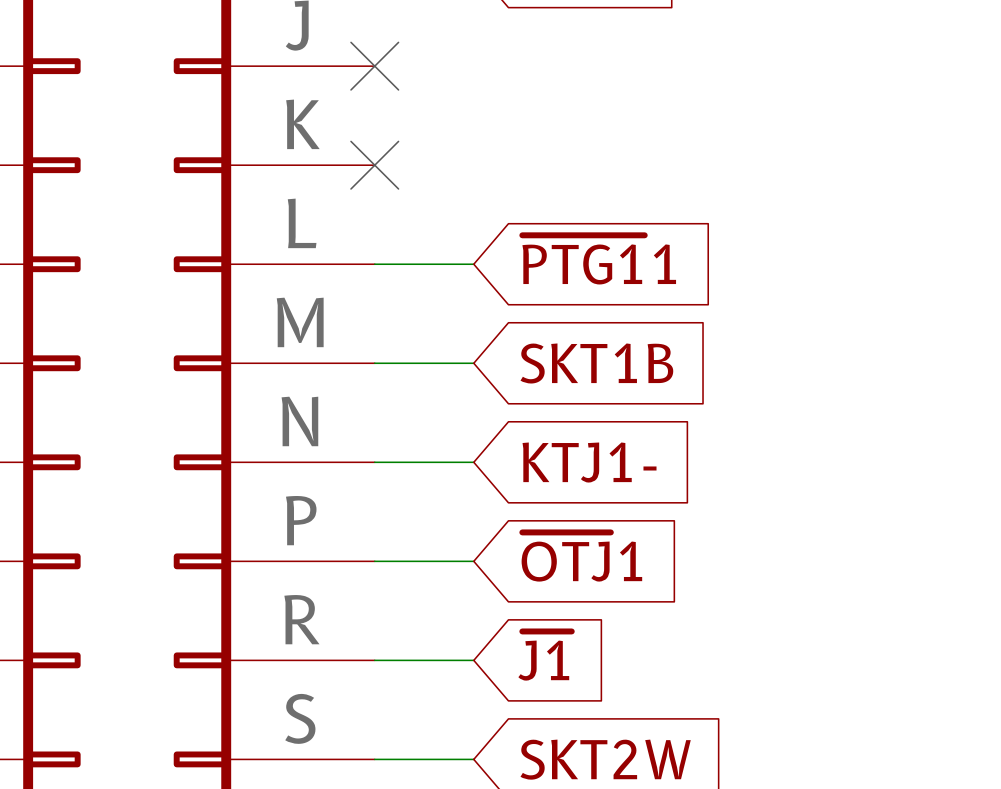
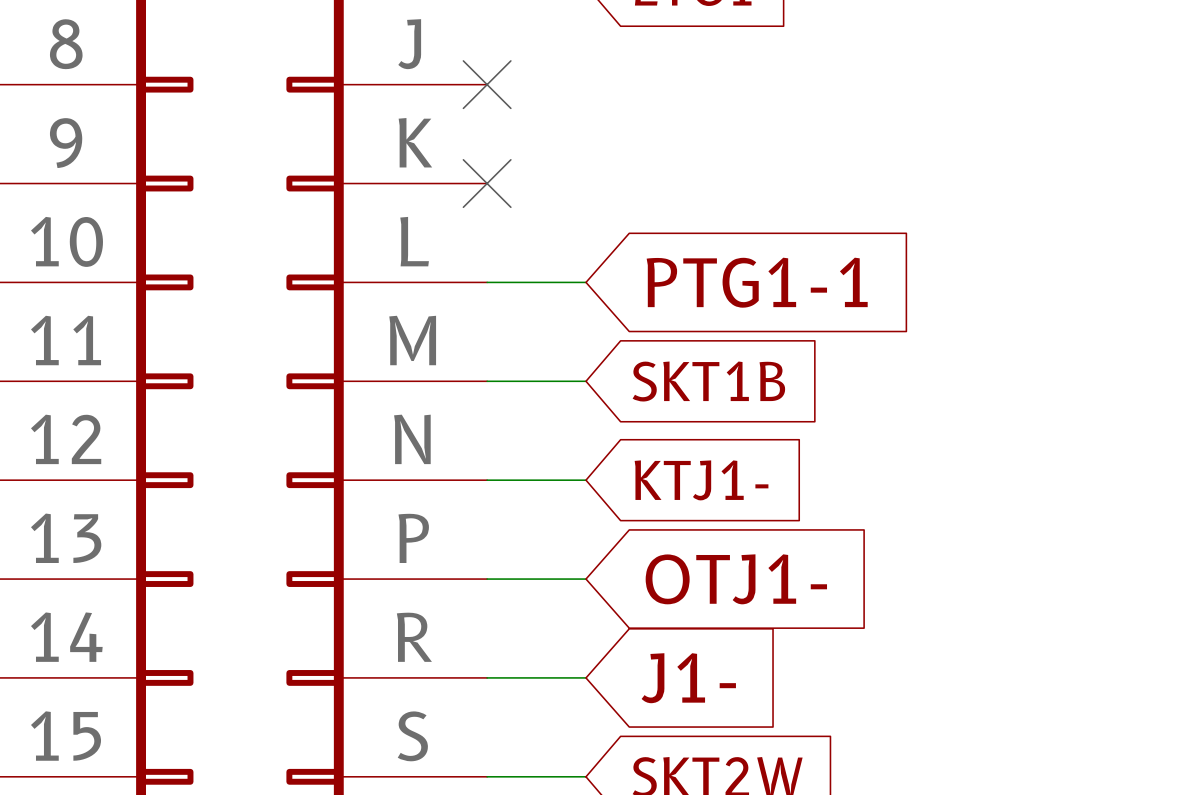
global label: ~{PTG1}1 (599, 259) -> PTG1-1 (757, 282)
global label: ~{OTJ}1 (581, 557) -> OTJ1- (736, 579)
global label: ~{J1} (545, 656) -> J1- (688, 678)

